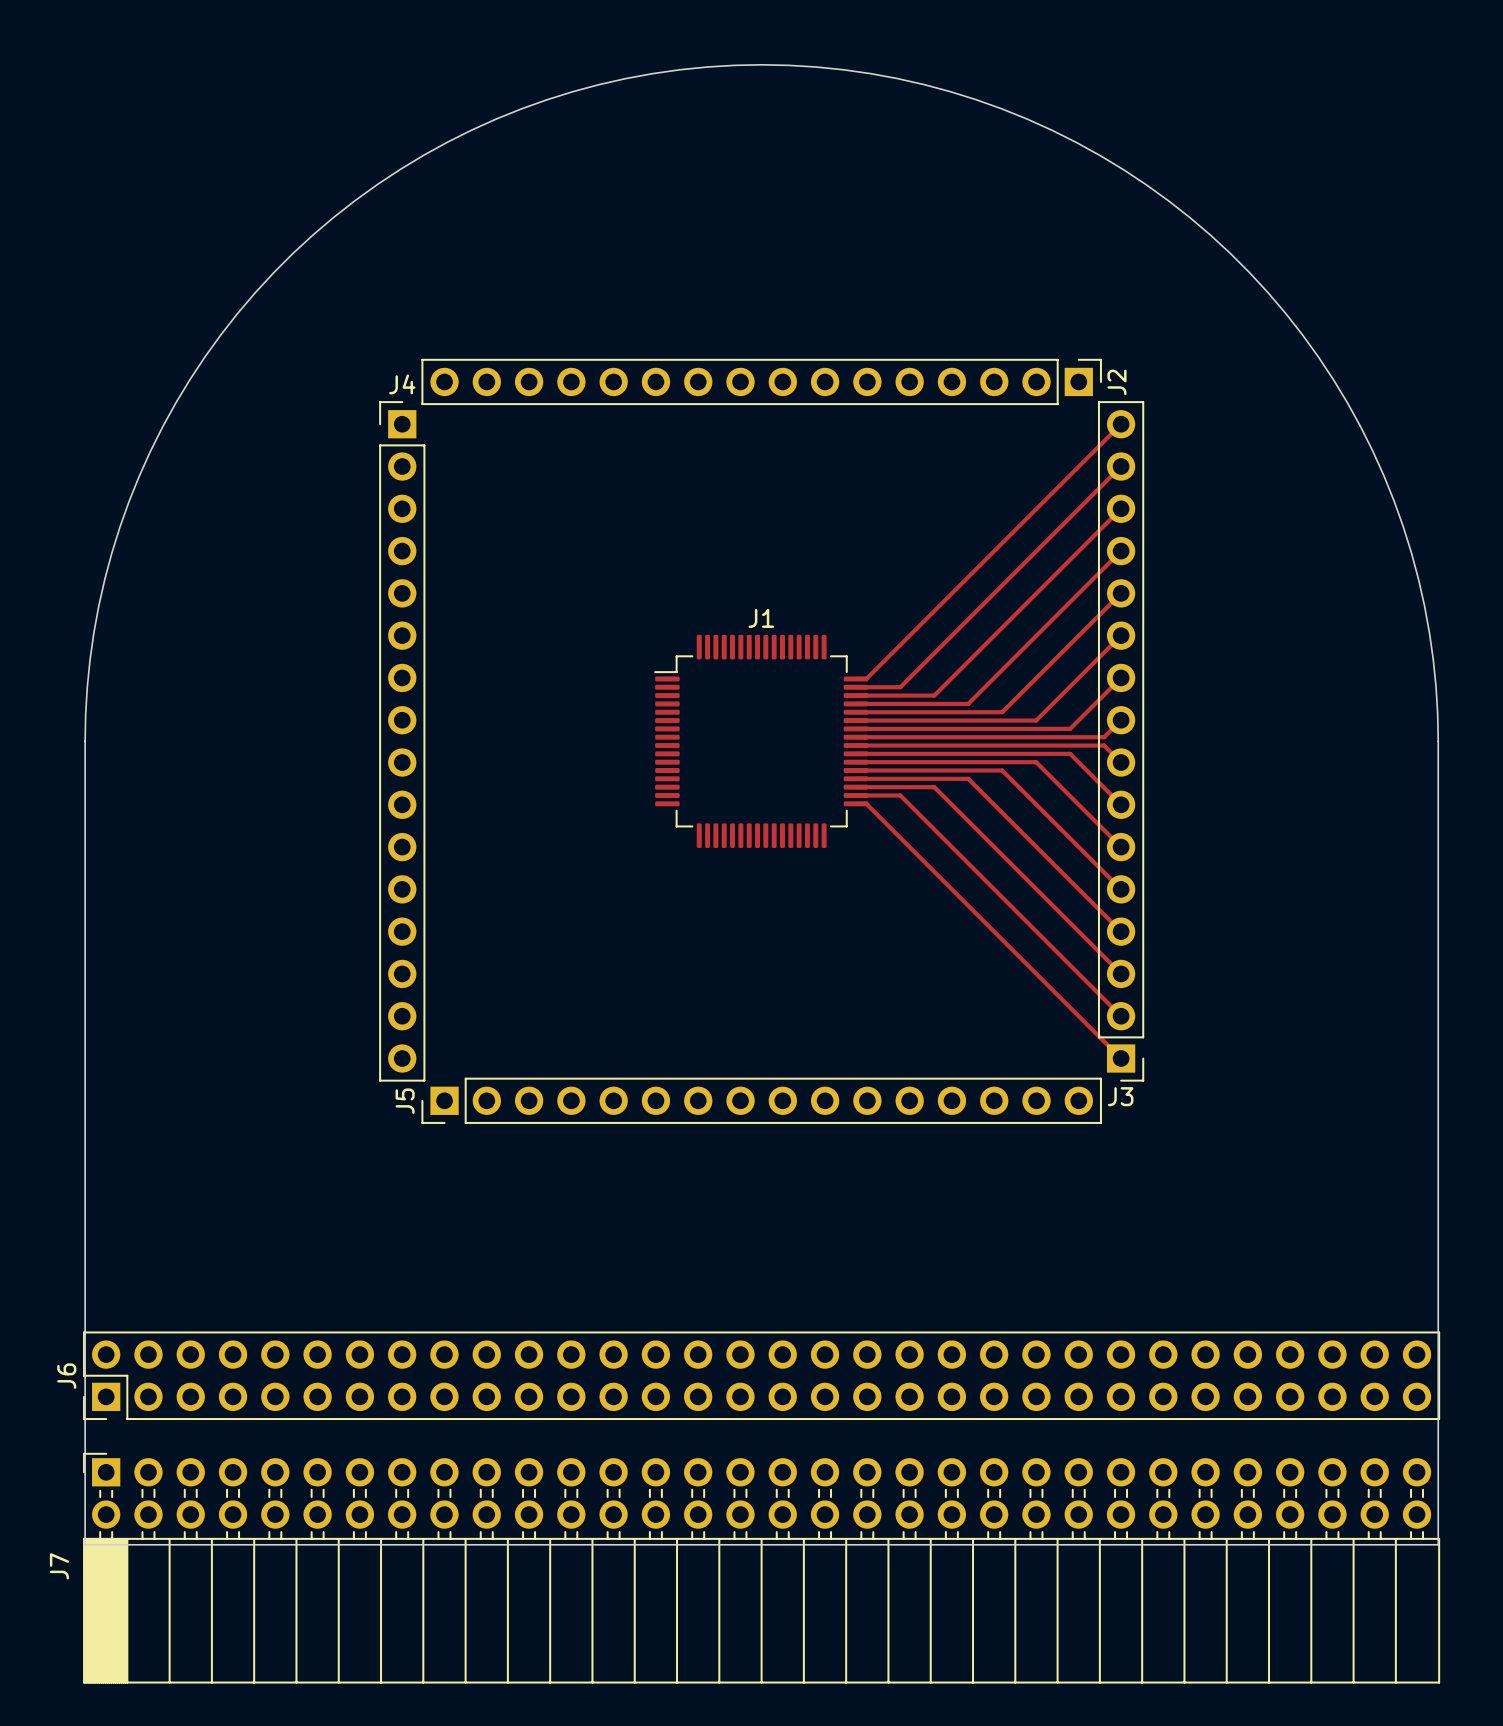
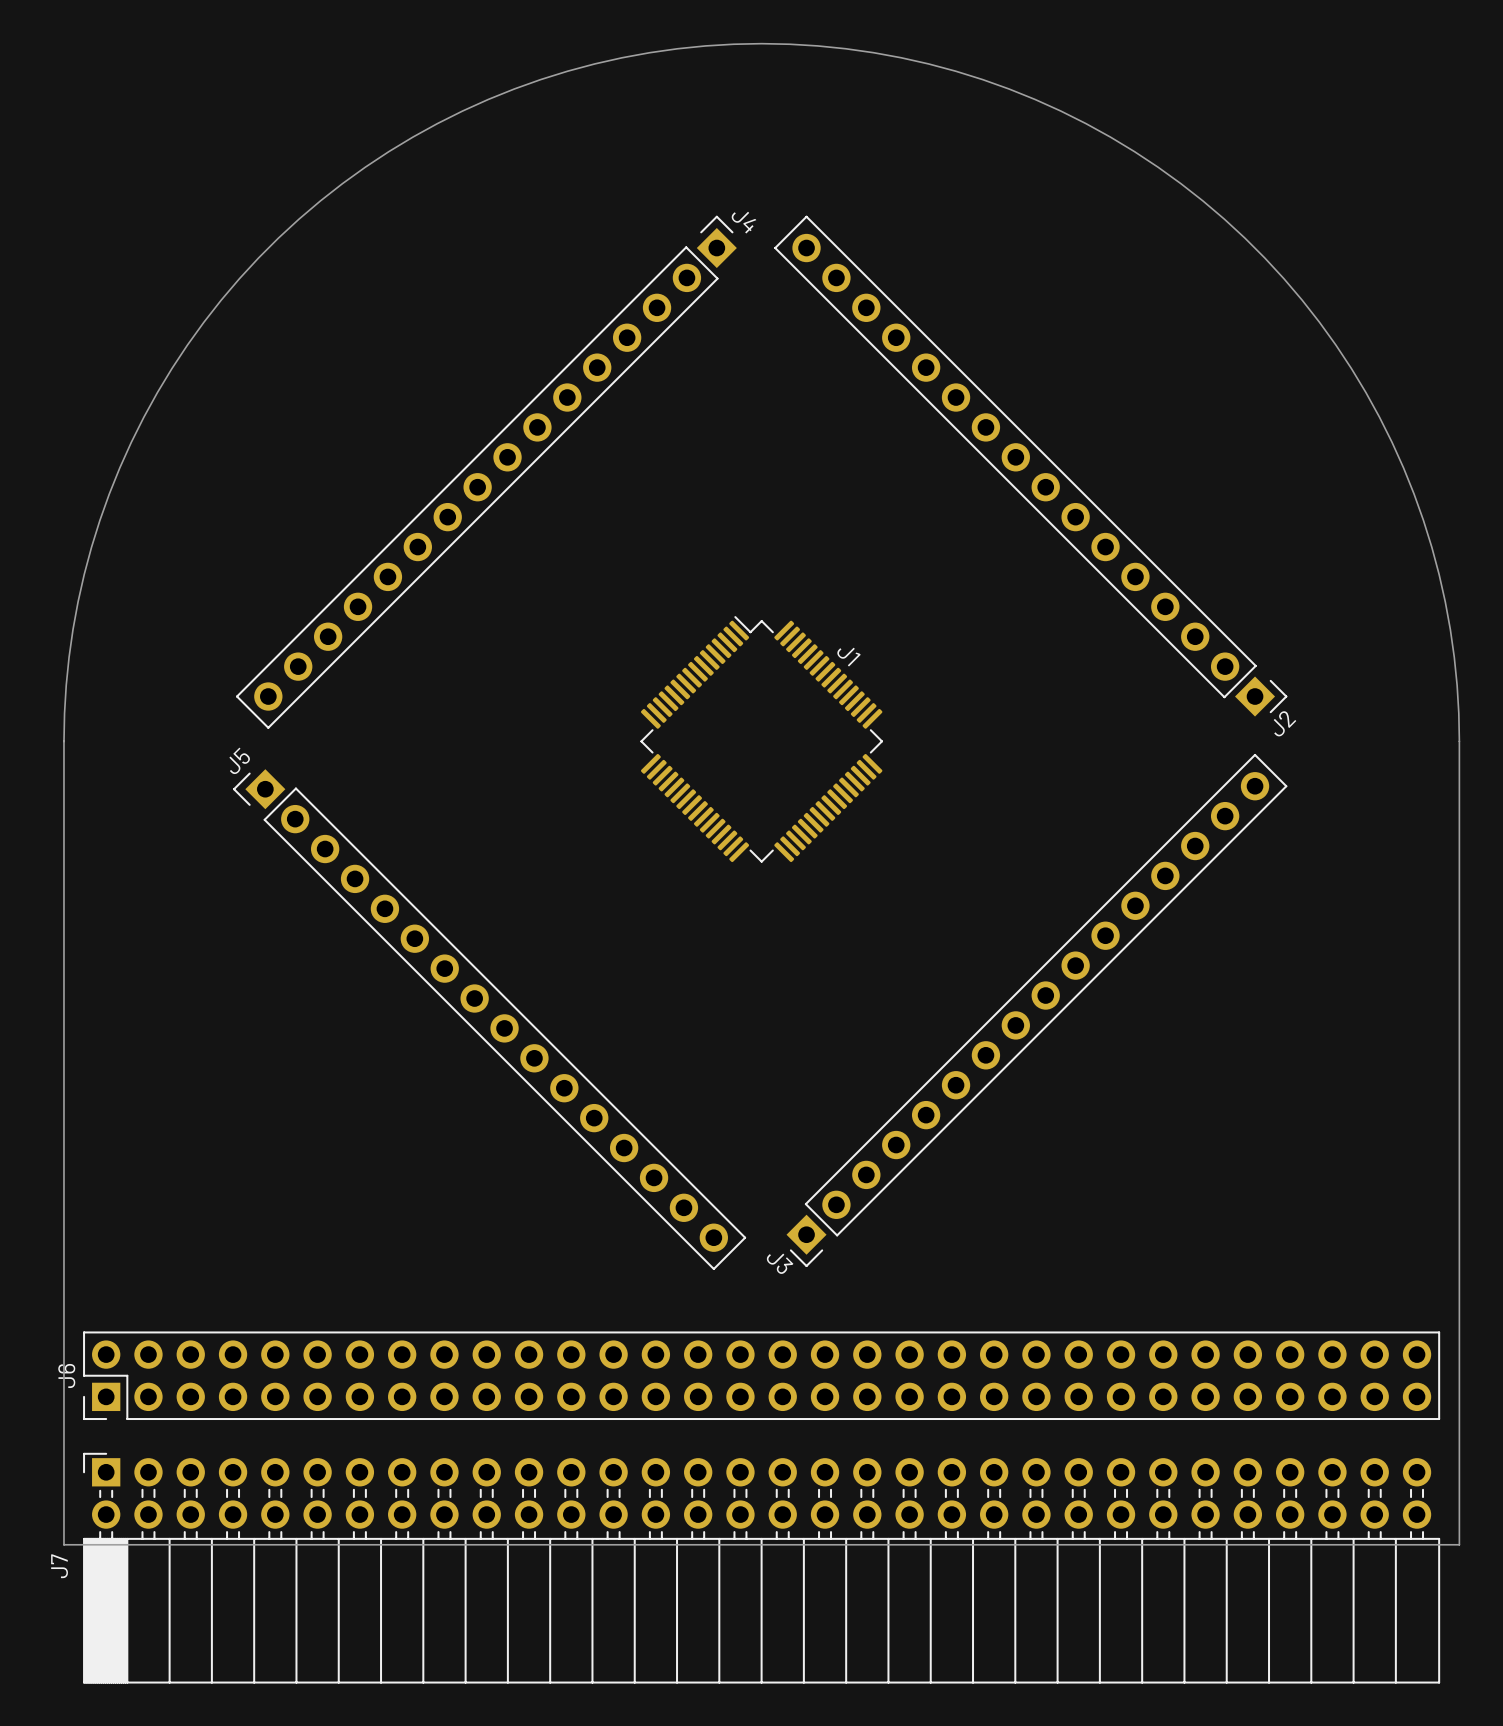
J2 rotation: 0° (761, 381) -> 45° clockwise (1030, 466)
track: (1121, 424) (866, 678) (855, 678) -> none
track: (1121, 466) (900, 687) (855, 687) -> none
track: (1121, 508) (934, 695) (855, 695) -> none
track: (1121, 551) (968, 703) (855, 703) -> none
track: (1121, 593) (1002, 712) (855, 712) -> none
track: (1121, 635) (1036, 720) (855, 720) -> none
track: (1121, 677) (1070, 728) (855, 728) -> none
track: (1121, 720) (1104, 737) (855, 737) -> none
J4 rotation: 0° (402, 741) -> 45° clockwise (486, 472)
J1 rotation: 0° (761, 741) -> 45° clockwise (761, 739)
J3 rotation: 0° (1121, 741) -> 45° clockwise (1036, 1010)
track: (855, 745) (1104, 745) (1121, 762) -> none
track: (855, 753) (1070, 753) (1121, 804) -> none
track: (855, 762) (1036, 762) (1121, 847) -> none
track: (855, 770) (1002, 770) (1121, 889) -> none
track: (855, 778) (968, 778) (1121, 931) -> none
track: (855, 787) (934, 787) (1121, 973) -> none
track: (855, 795) (900, 795) (1121, 1016) -> none
track: (855, 803) (866, 803) (1121, 1058) -> none
J5 rotation: 0° (761, 1100) -> 45° clockwise (489, 1019)
board edge: (85, 1544) (85, 714) (93, 632) (104, 579) (119, 527) (150, 451) (189, 379) (220, 334) (255, 292) (293, 253) (333, 217) (400, 169) (471, 130) (521, 108) (573, 91) (653, 73) (707, 67) (761, 64) (843, 69) (897, 78) (949, 91) (1001, 108) (1051, 130) (1123, 169) (1189, 217) (1230, 253) (1268, 292) (1318, 357) (1347, 403) (1372, 451) (1394, 501) (1418, 579) (1433, 659) (1437, 714) (1438, 1544) -> (85, 1544) (63, 1544) (64, 713) (73, 629) (84, 574) (99, 520) (131, 442) (157, 392) (187, 345) (239, 278) (299, 219) (342, 183) (388, 151) (437, 123) (488, 99) (567, 71) (649, 52) (705, 45) (761, 43) (817, 45) (873, 52) (955, 71) (1035, 99) (1085, 123) (1134, 151) (1202, 200) (1245, 238) (1283, 278) (1319, 322) (1351, 368) (1392, 442) (1414, 493) (1439, 574) (1450, 629) (1458, 713) (1459, 1544) (1438, 1544)

